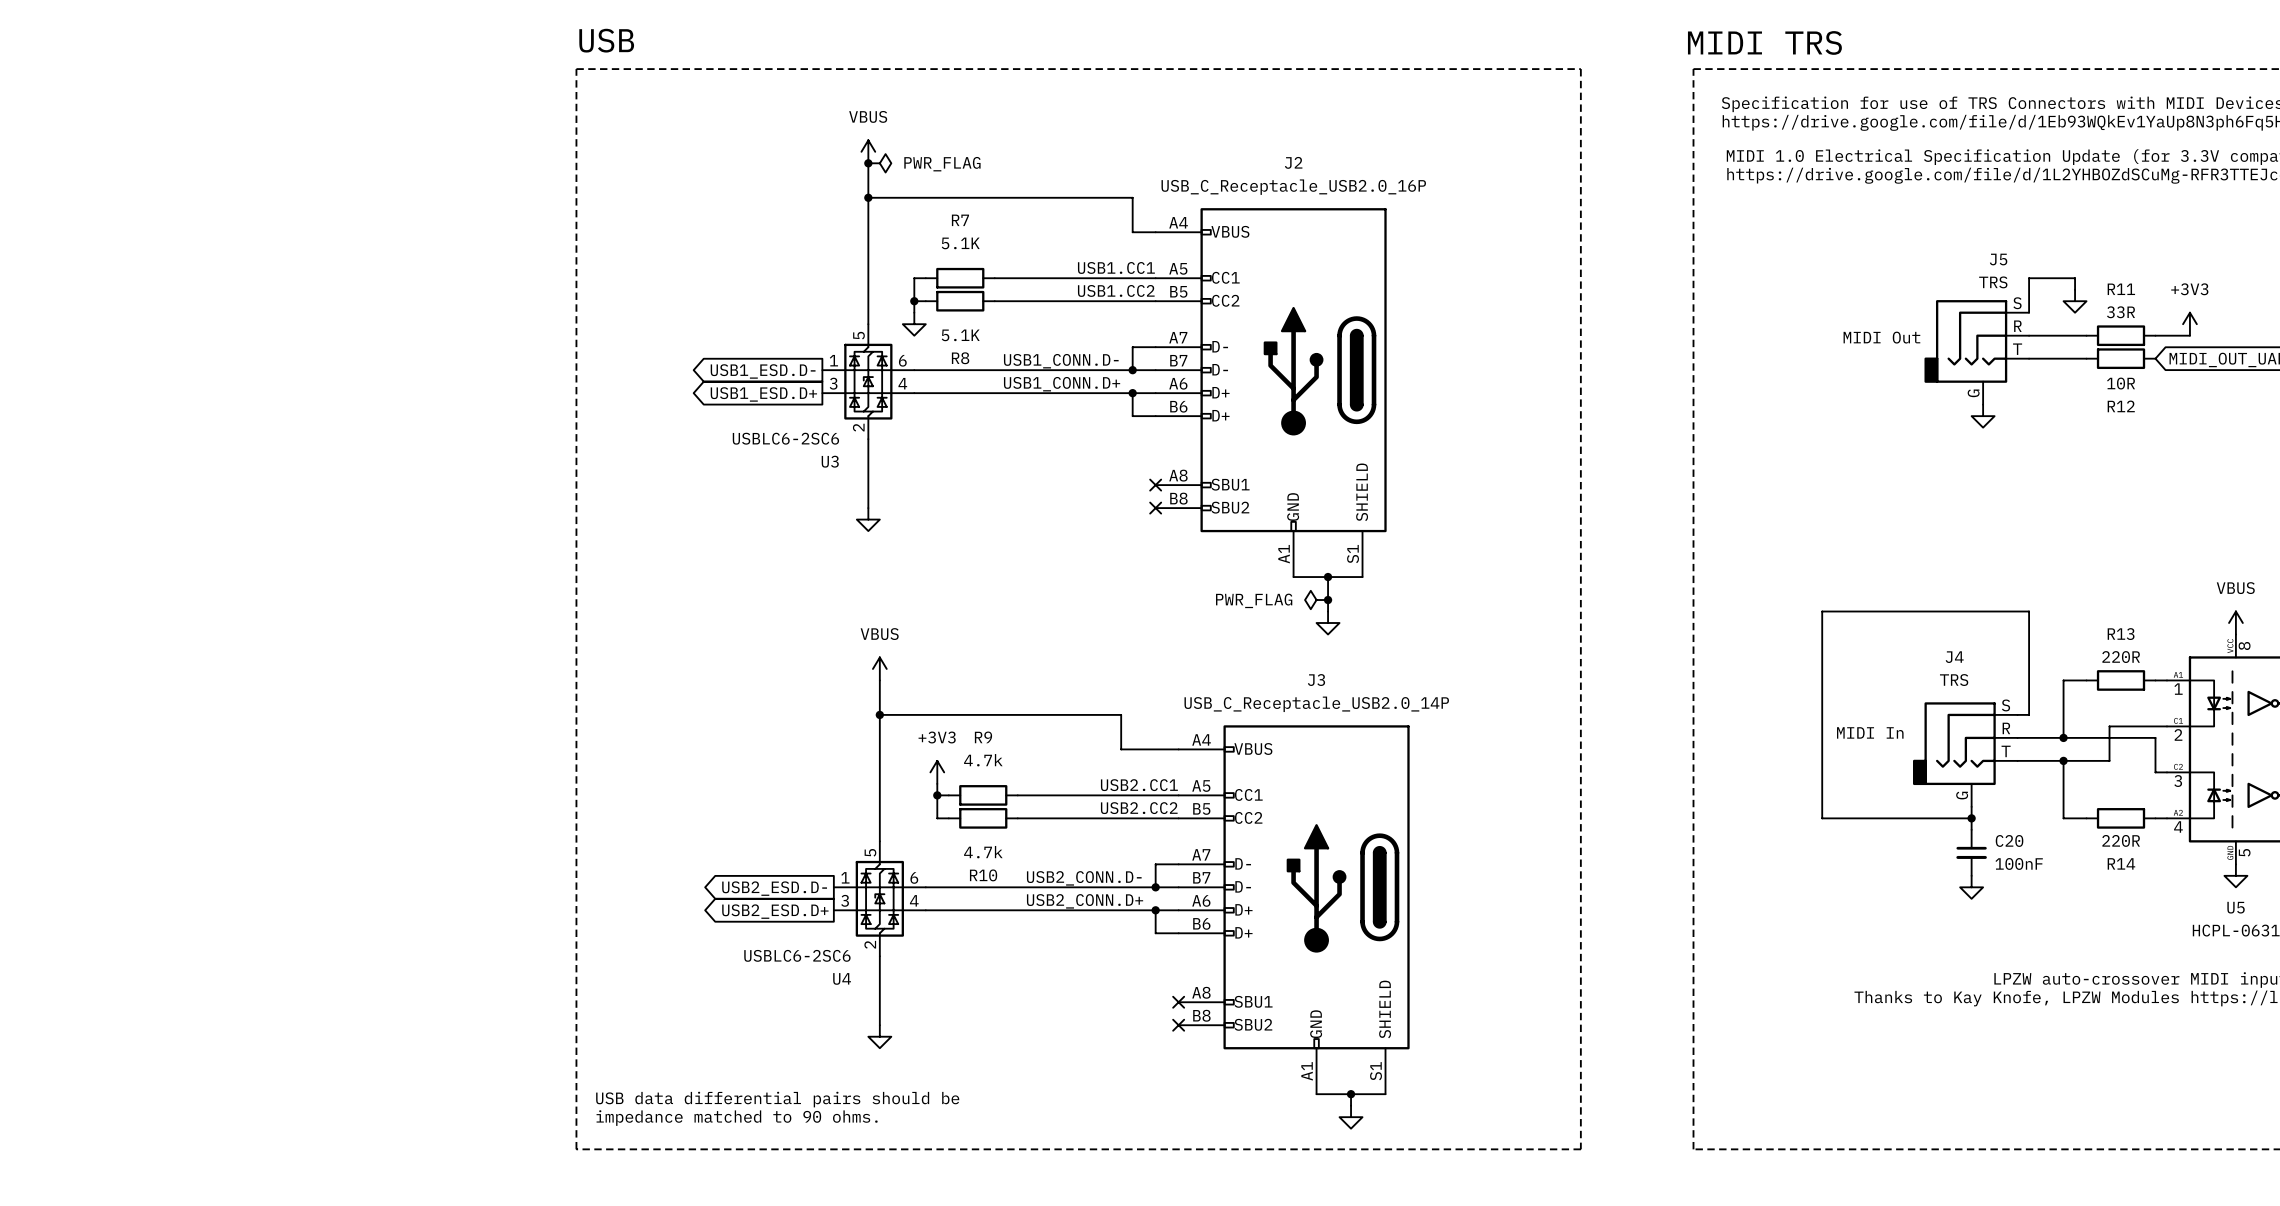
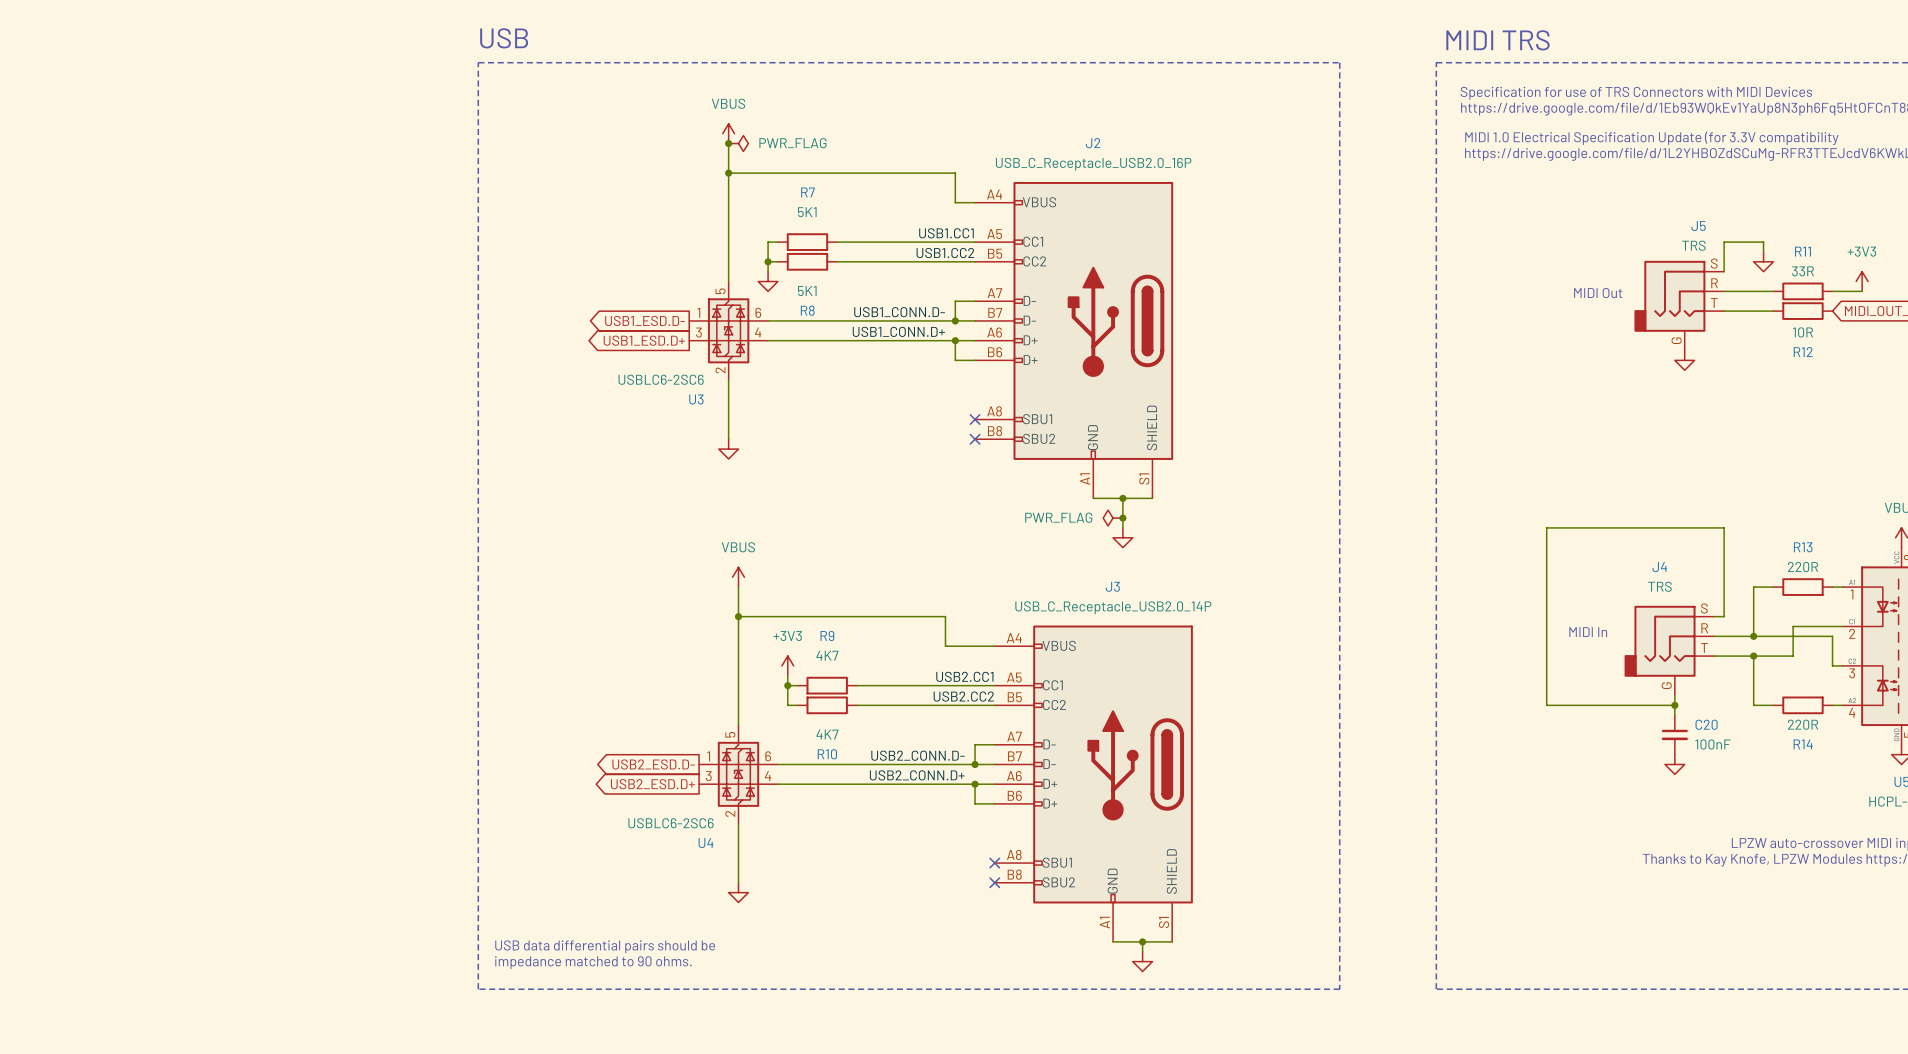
R7 text: 5.1K (960, 243) -> 5K1 (807, 212)
R8 text: 5.1K (960, 335) -> 5K1 (807, 291)
R9 text: 4.7k (983, 760) -> 4K7 (827, 655)
R10 text: 4.7k (983, 852) -> 4K7 (827, 734)

